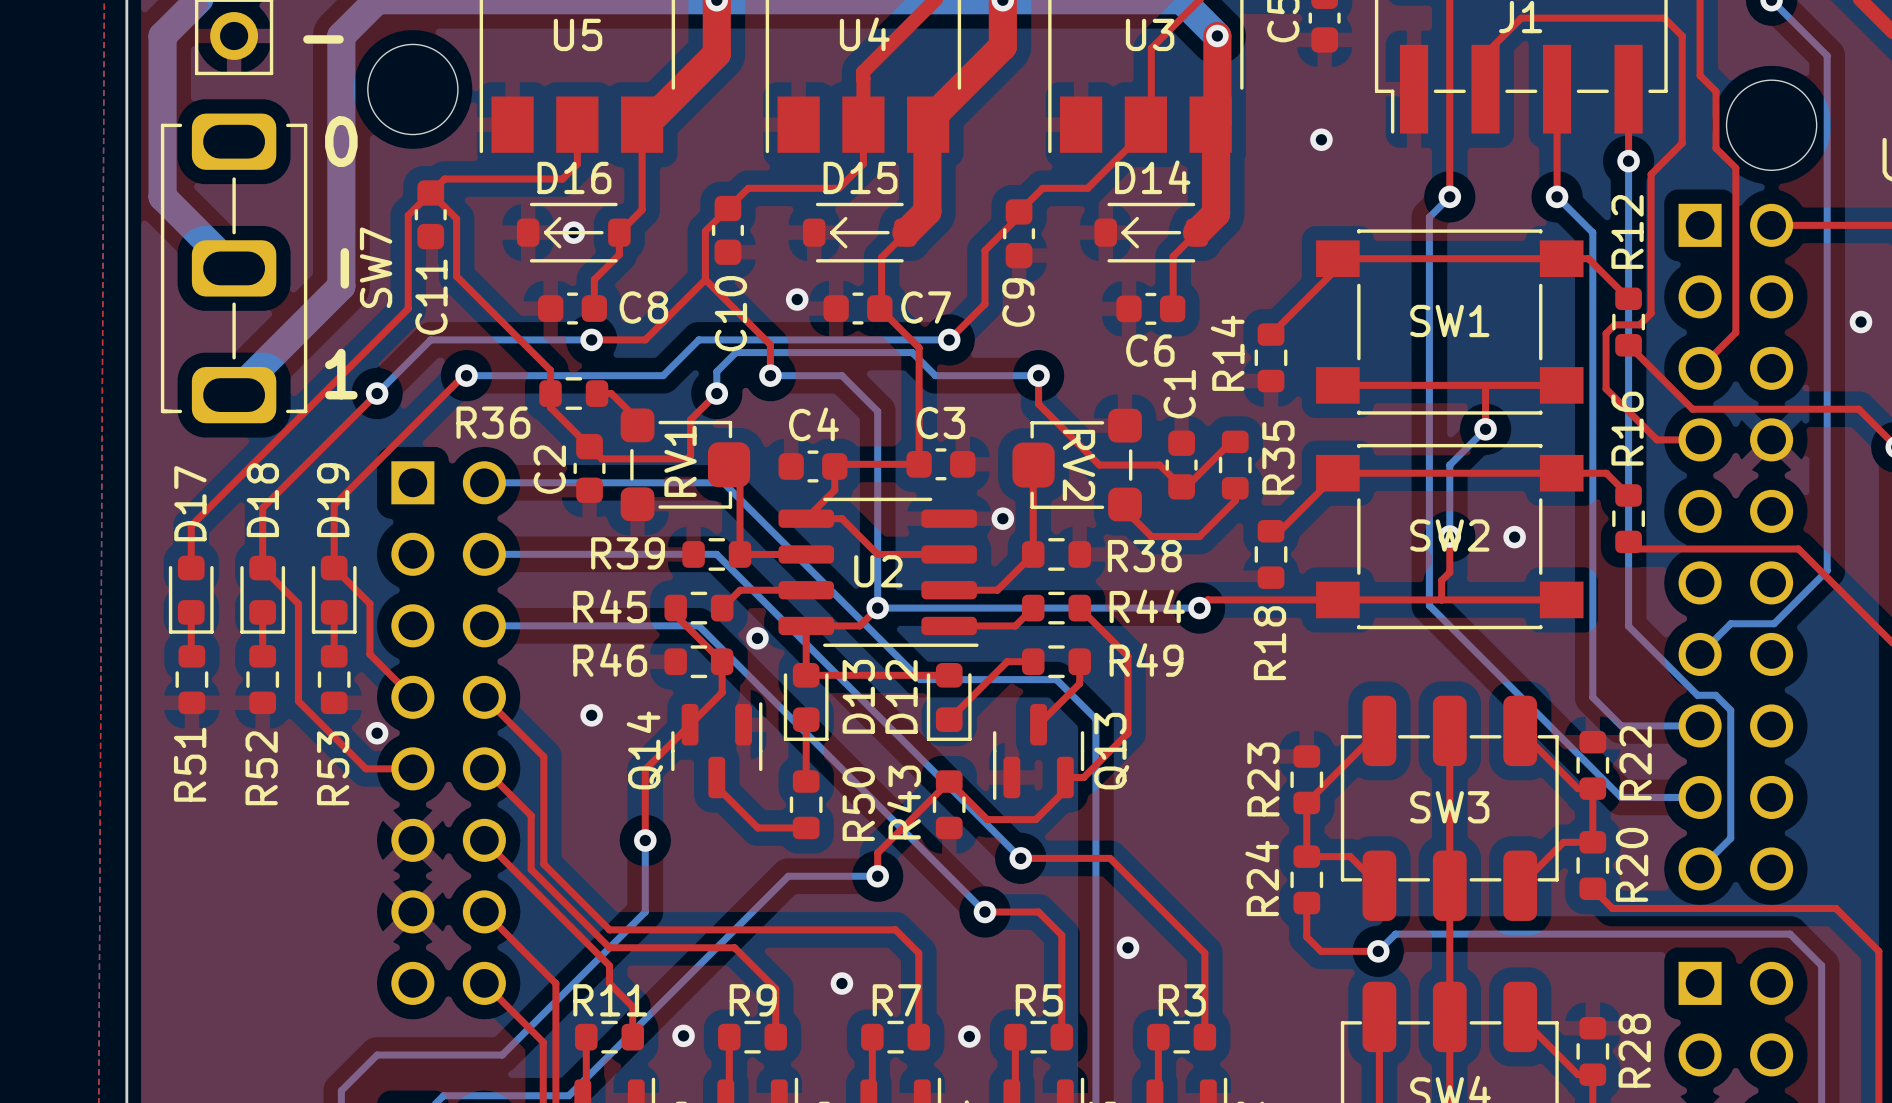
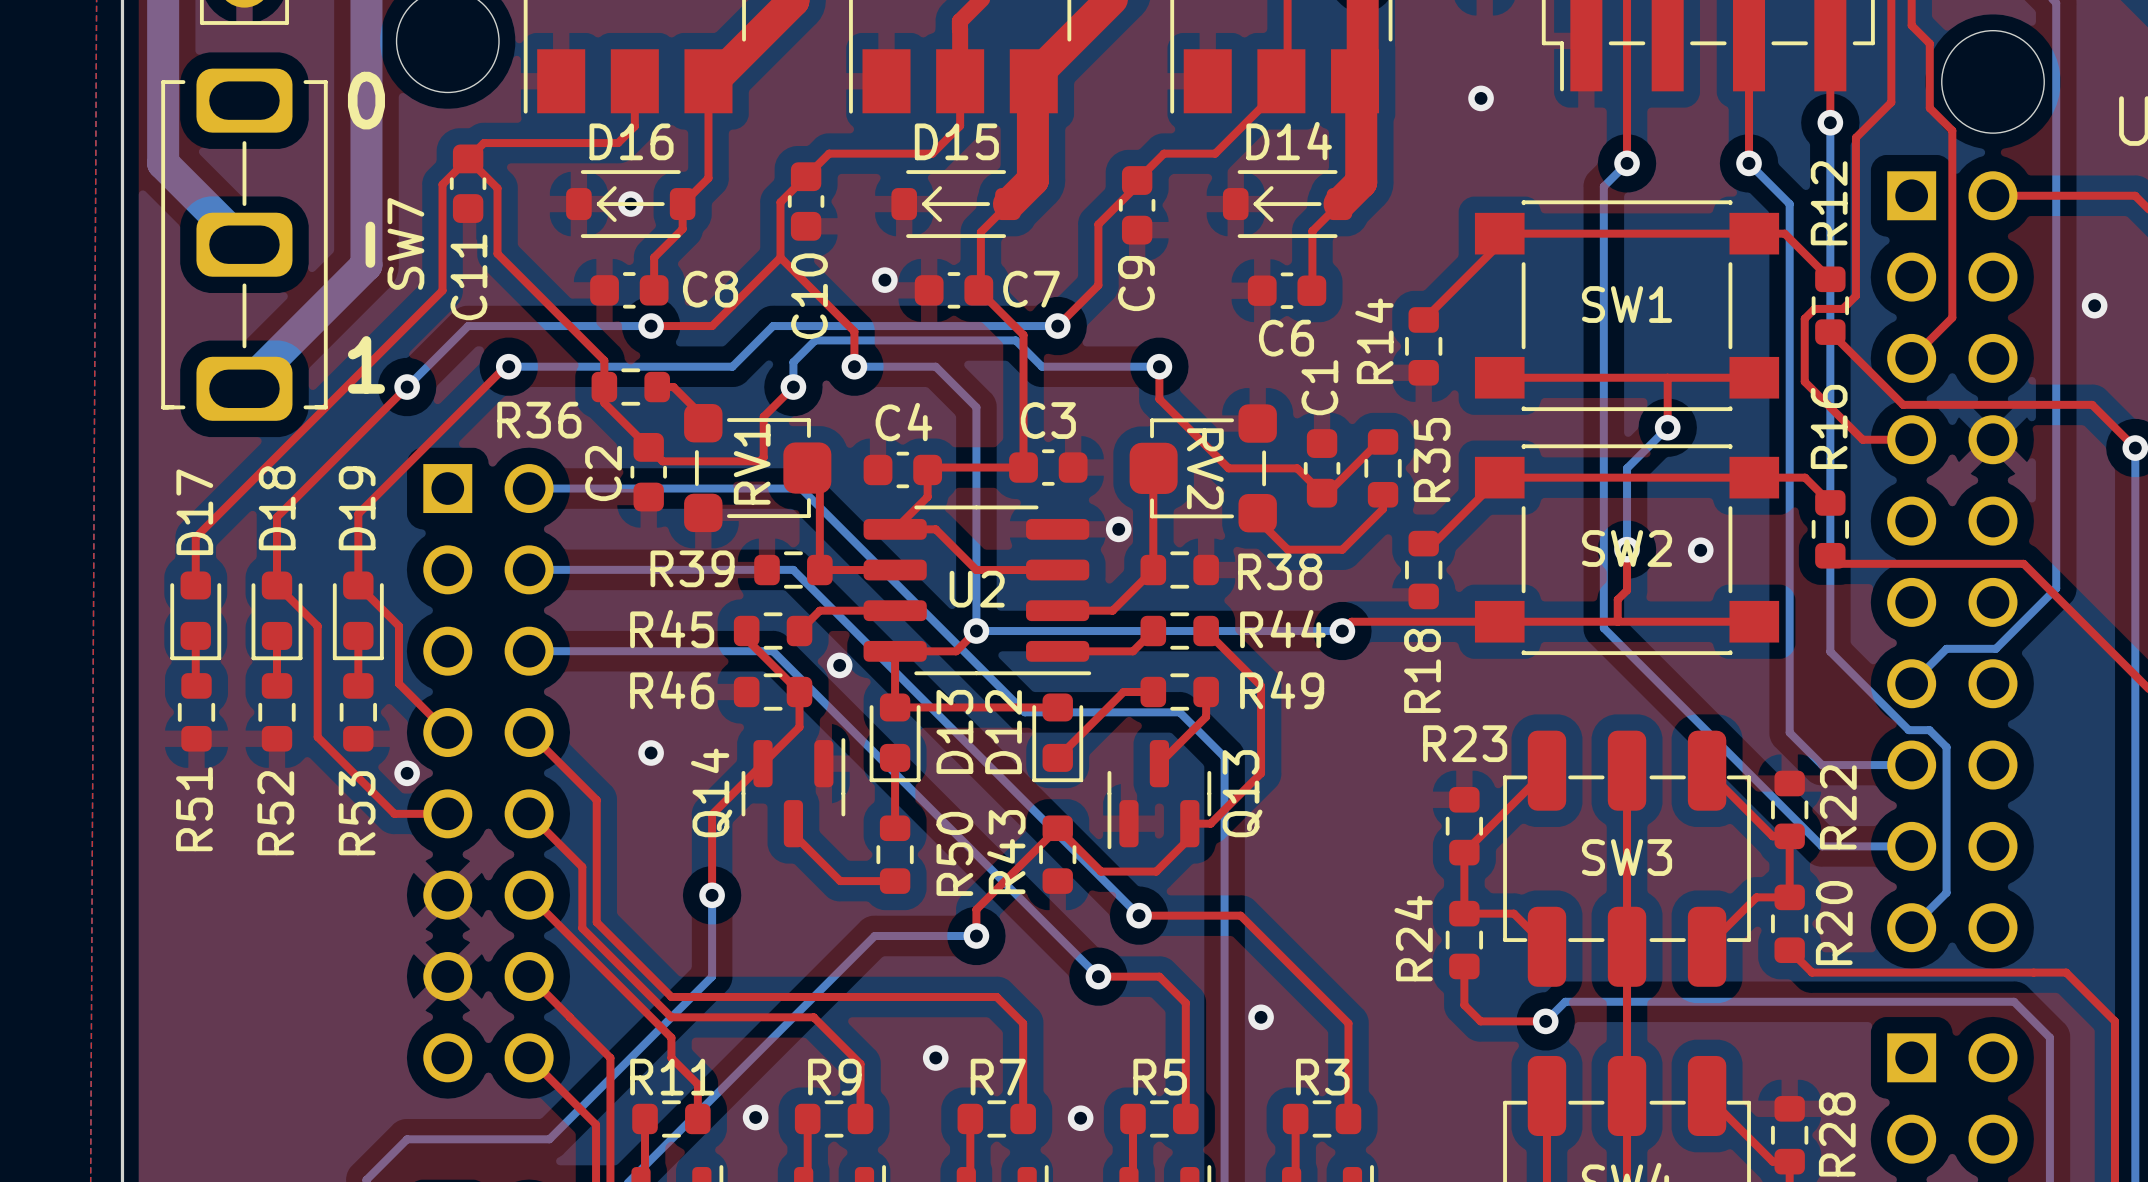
R23 name rotation: 0° (1263, 779) -> 90° clockwise (1465, 743)

